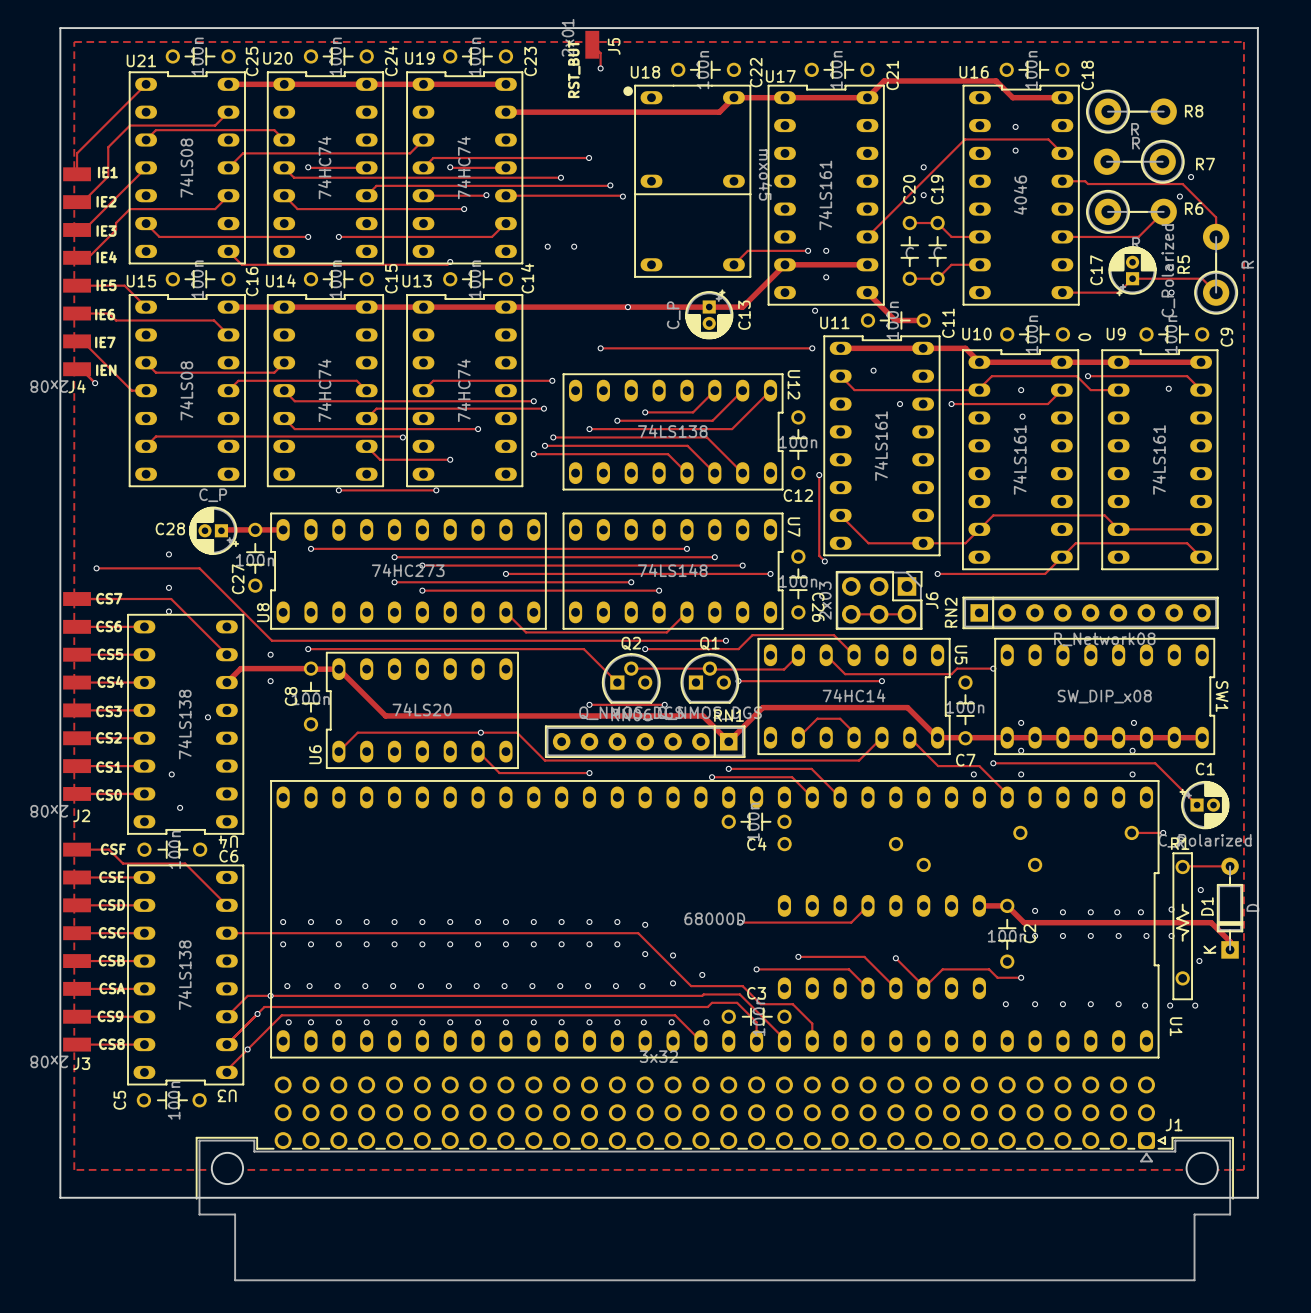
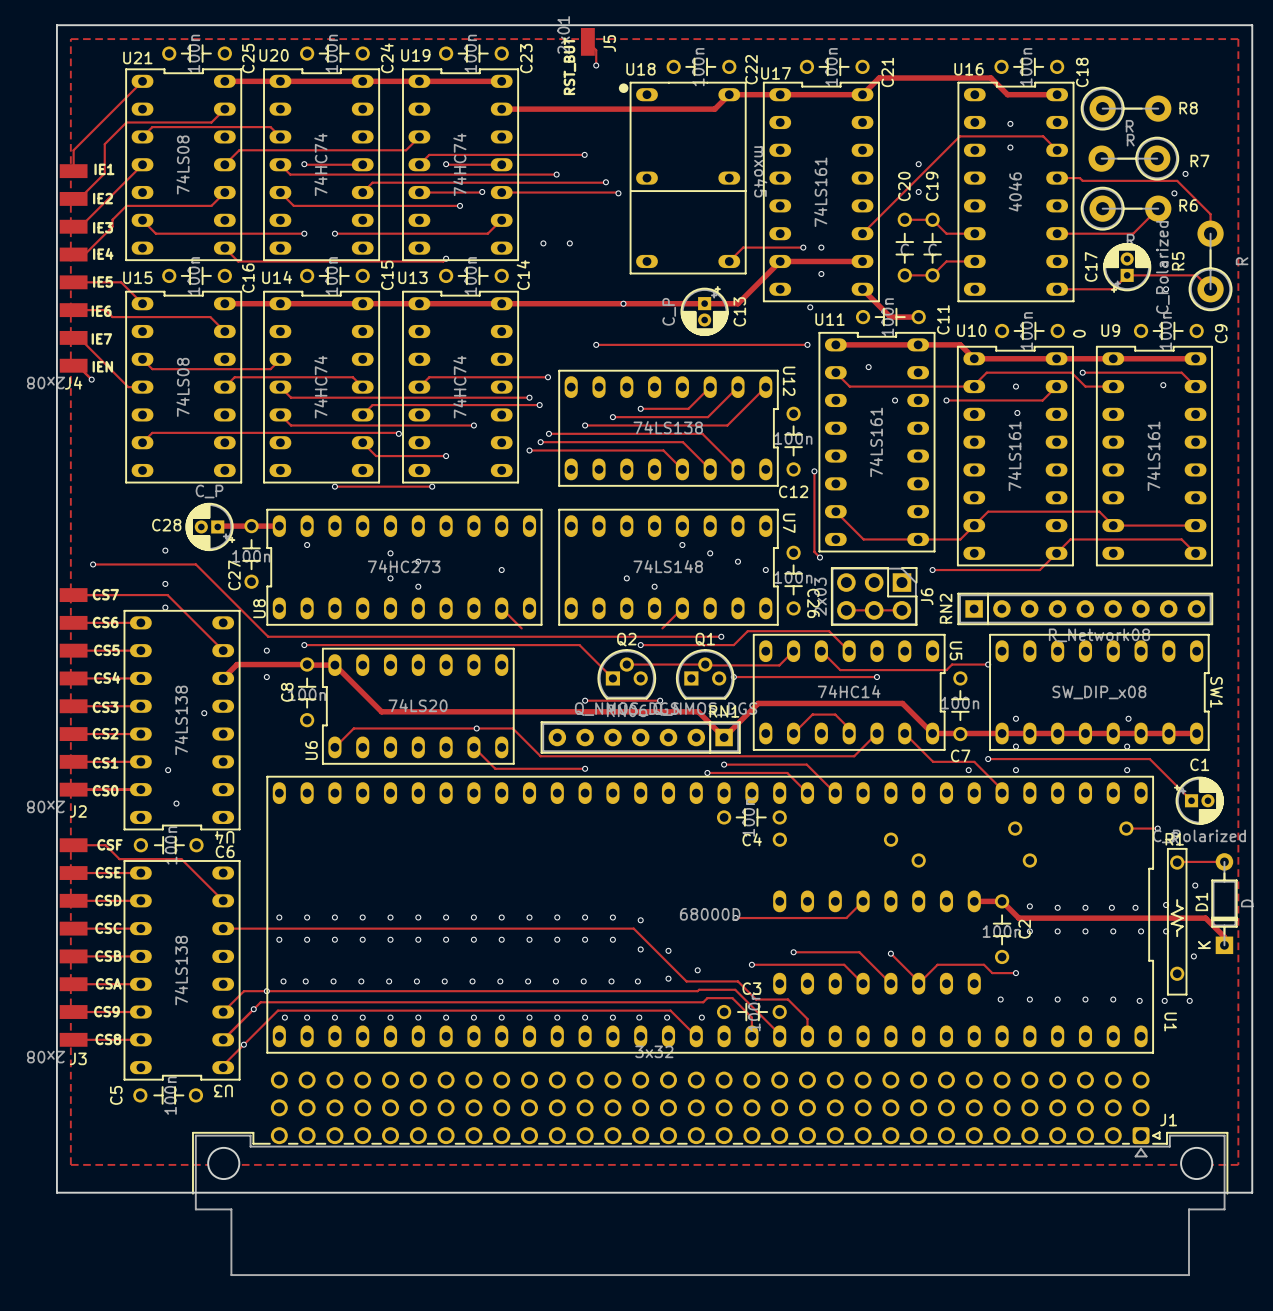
track: (311, 548) (686, 548) -> none
track: (394, 557) (714, 557) -> none
track: (422, 565) (742, 565) -> none
track: (505, 573) (770, 573) -> none
track: (394, 582) (631, 582) -> none
track: (422, 590) (659, 590) -> none
track: (525, 632) (666, 632) -> none

